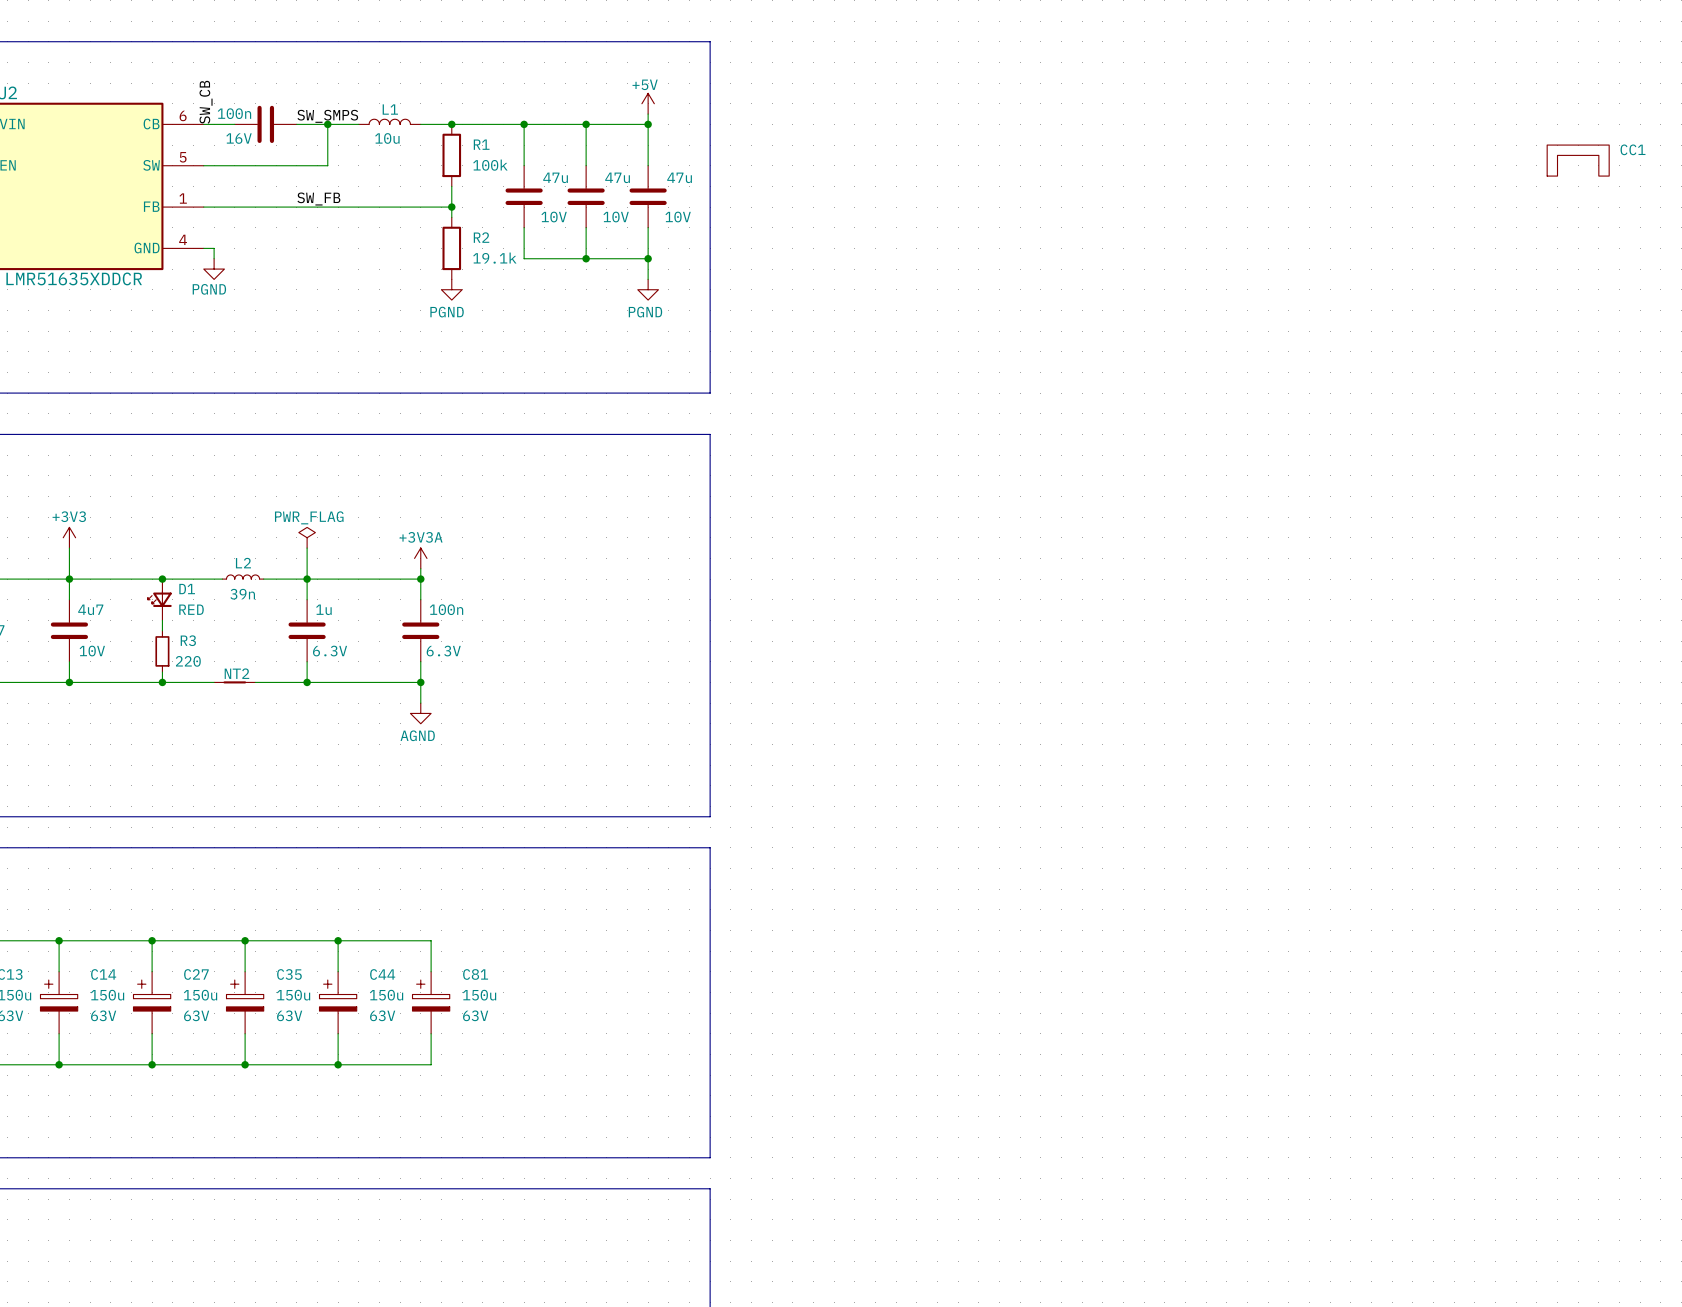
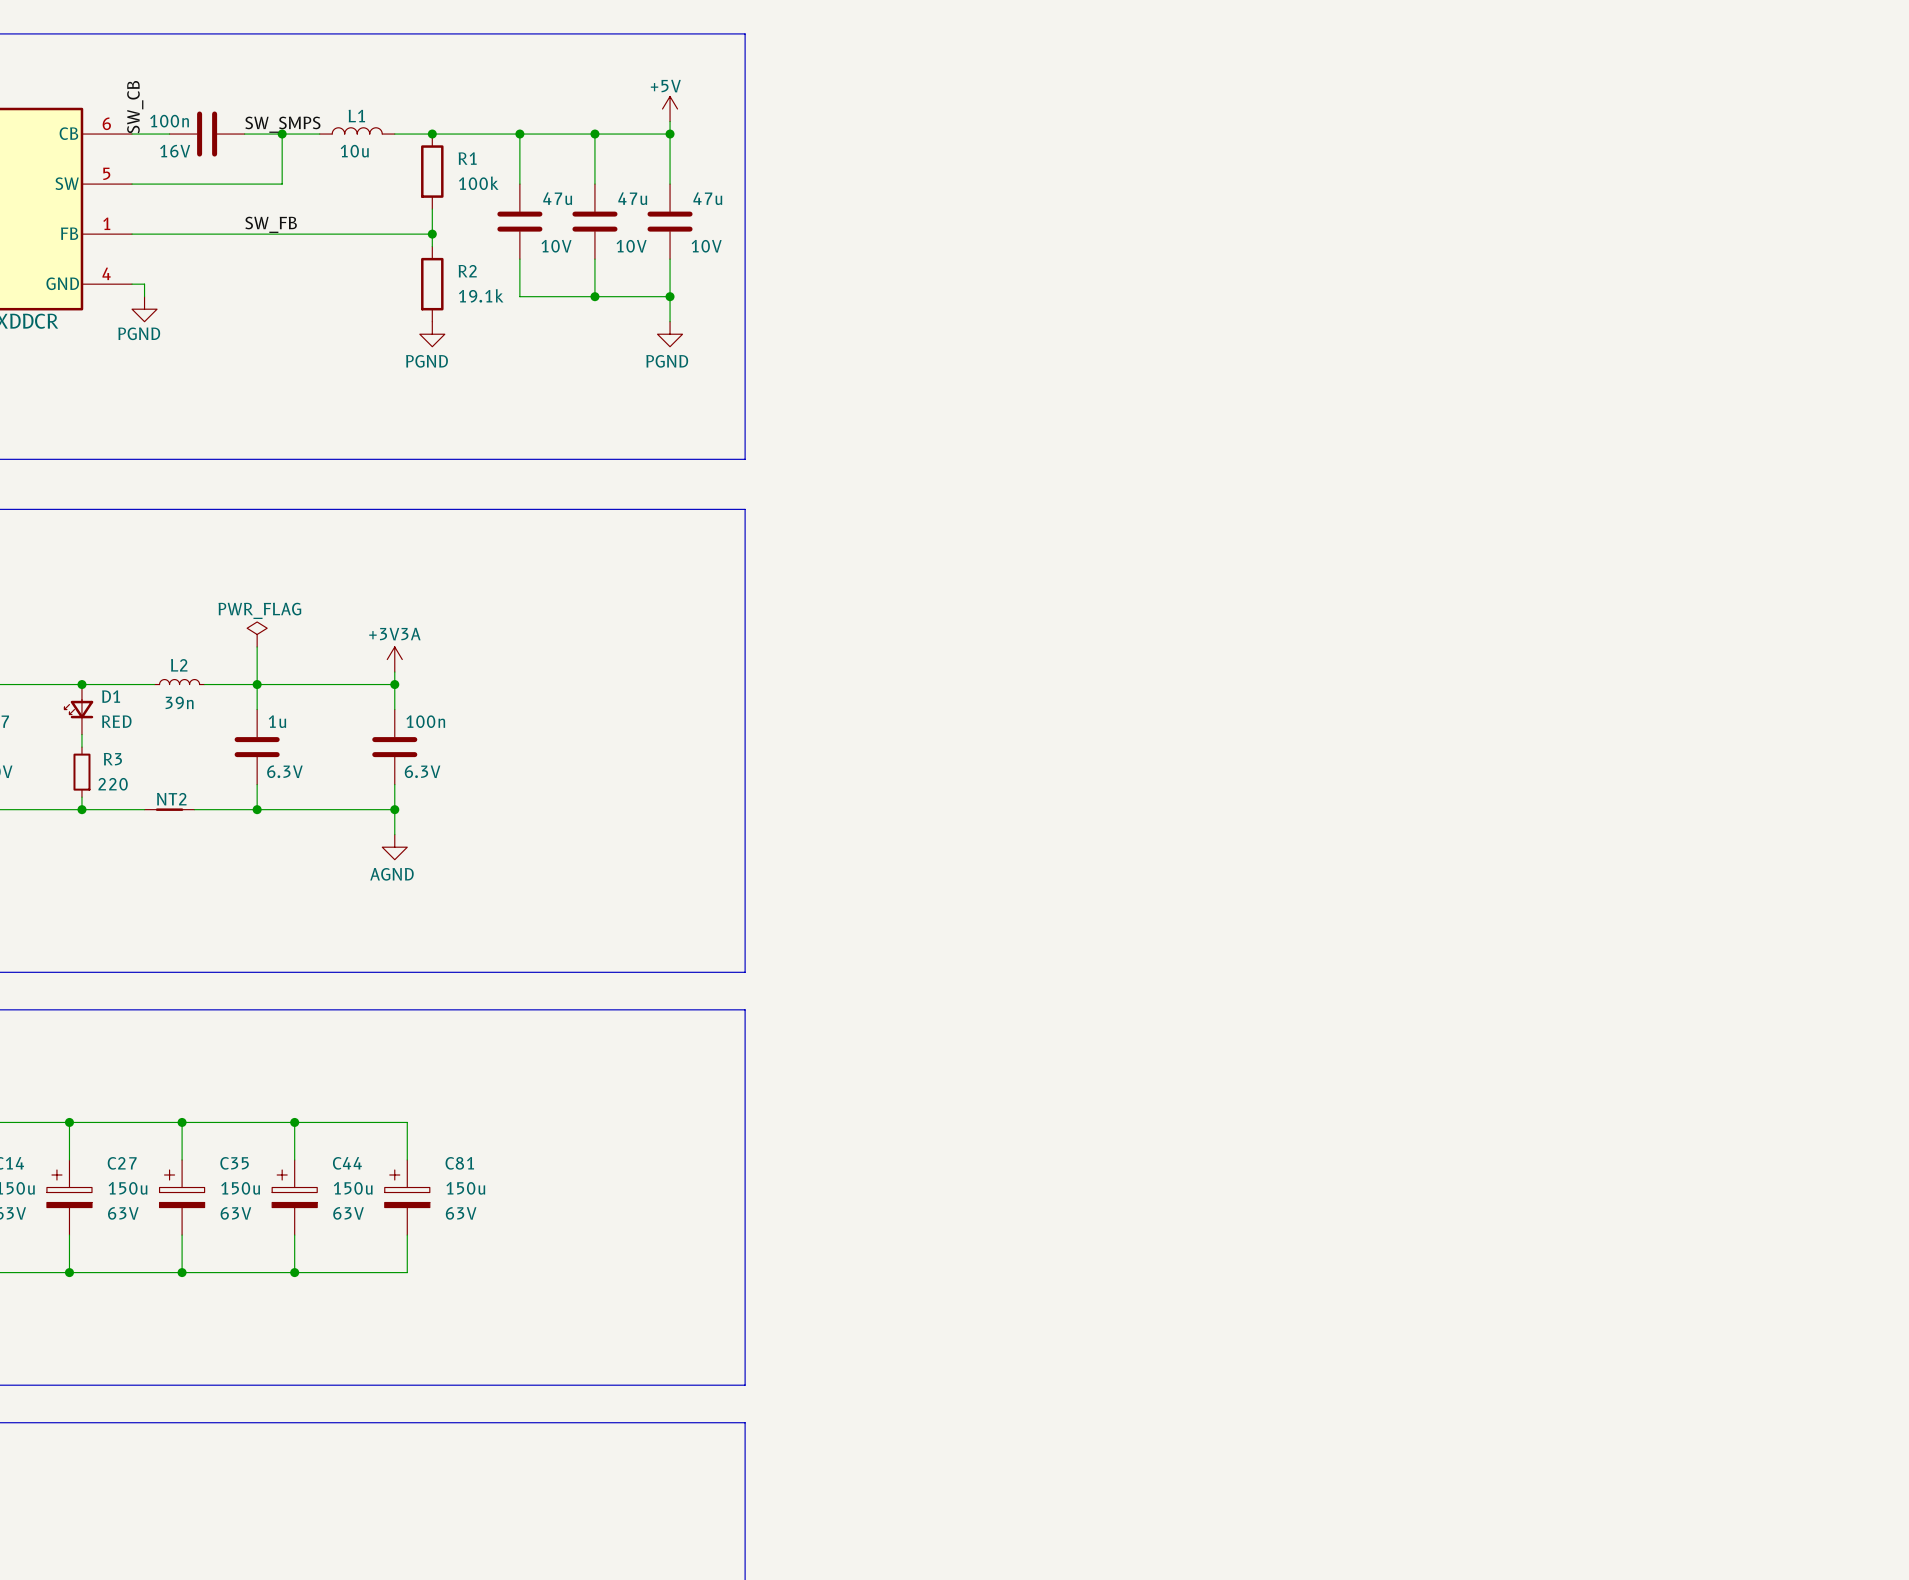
CC1: (1578, 160) -> none

